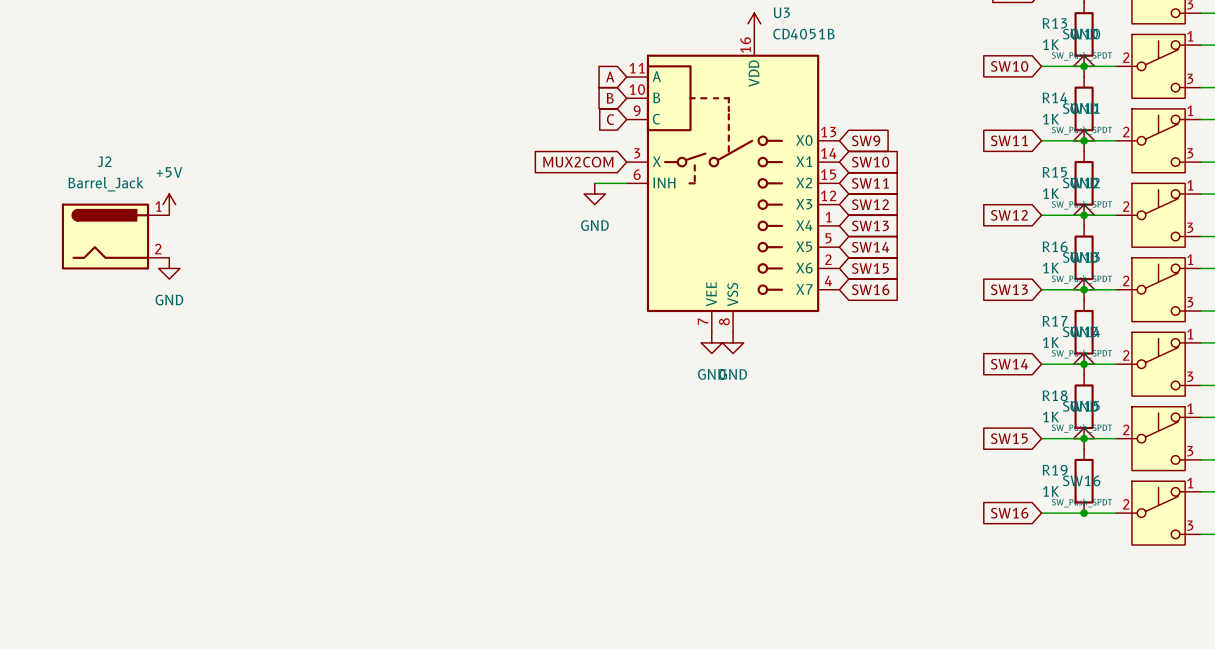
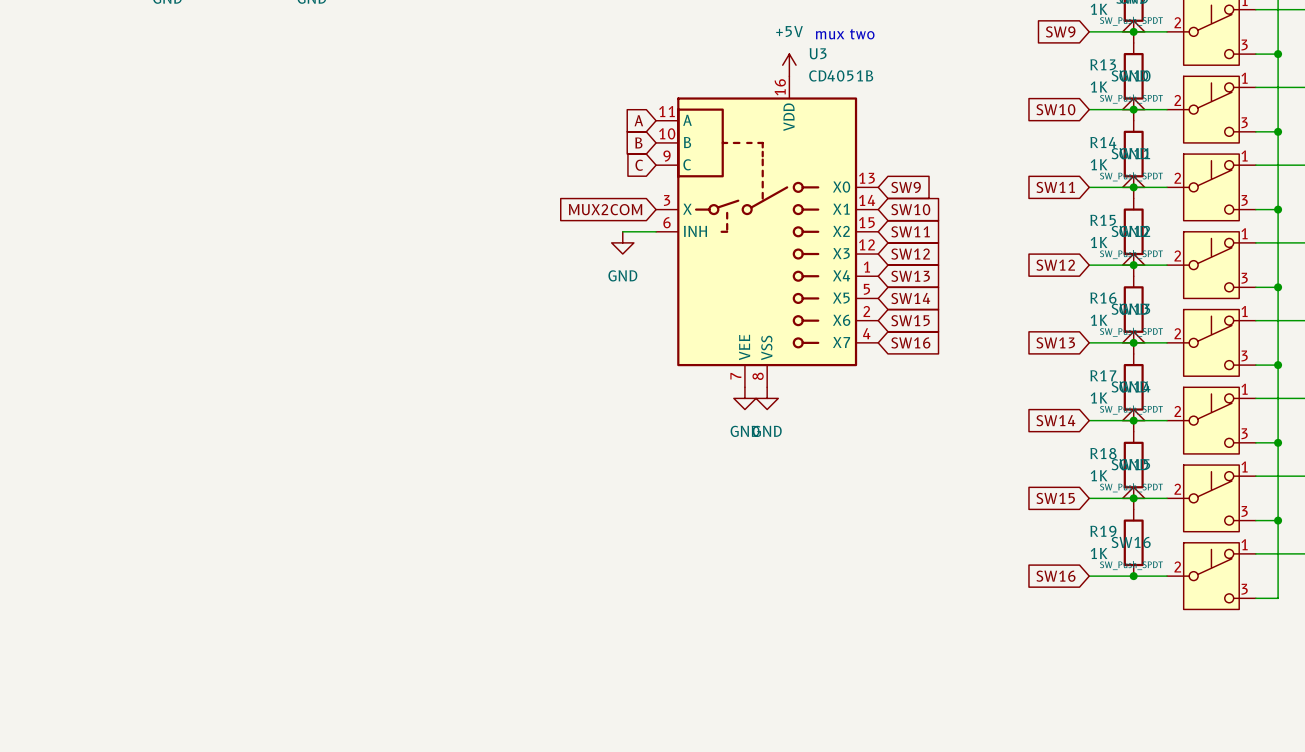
power symbol: +5V (169, 204) -> none
J2: Barrel_Jack (115, 236) -> none
power symbol: GND (169, 268) -> none

